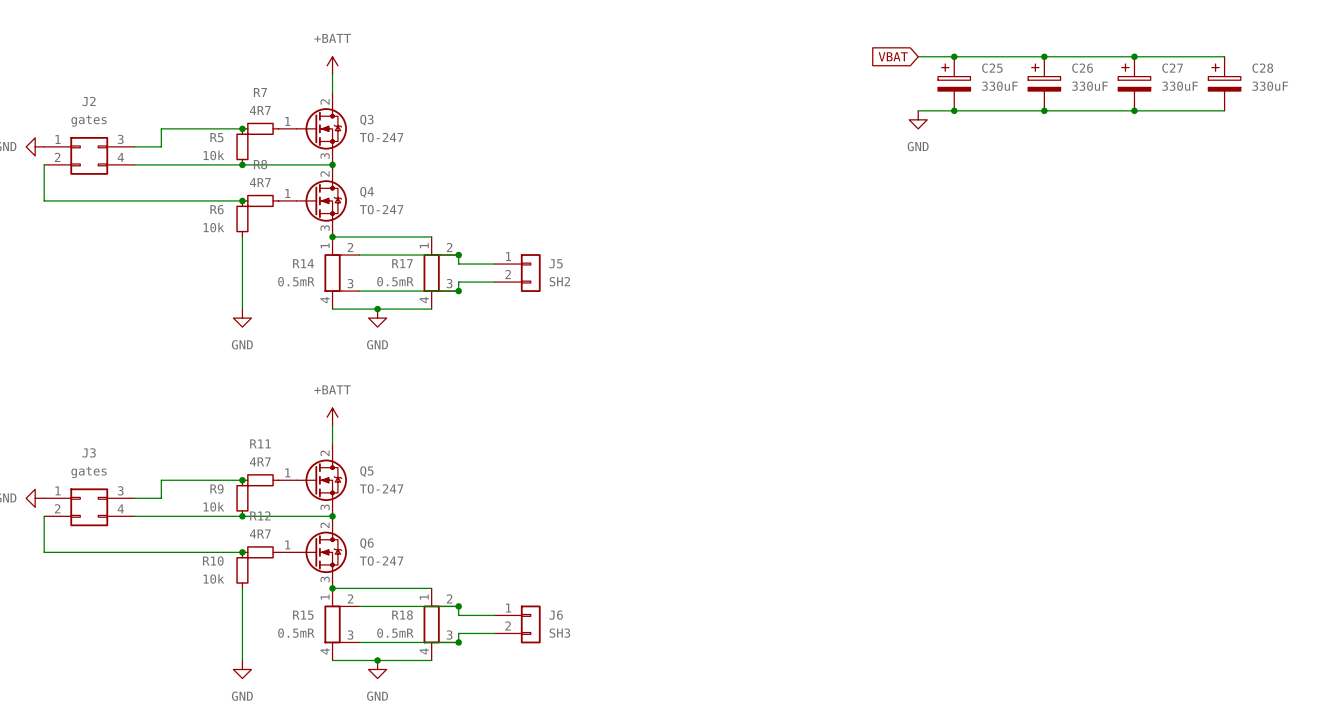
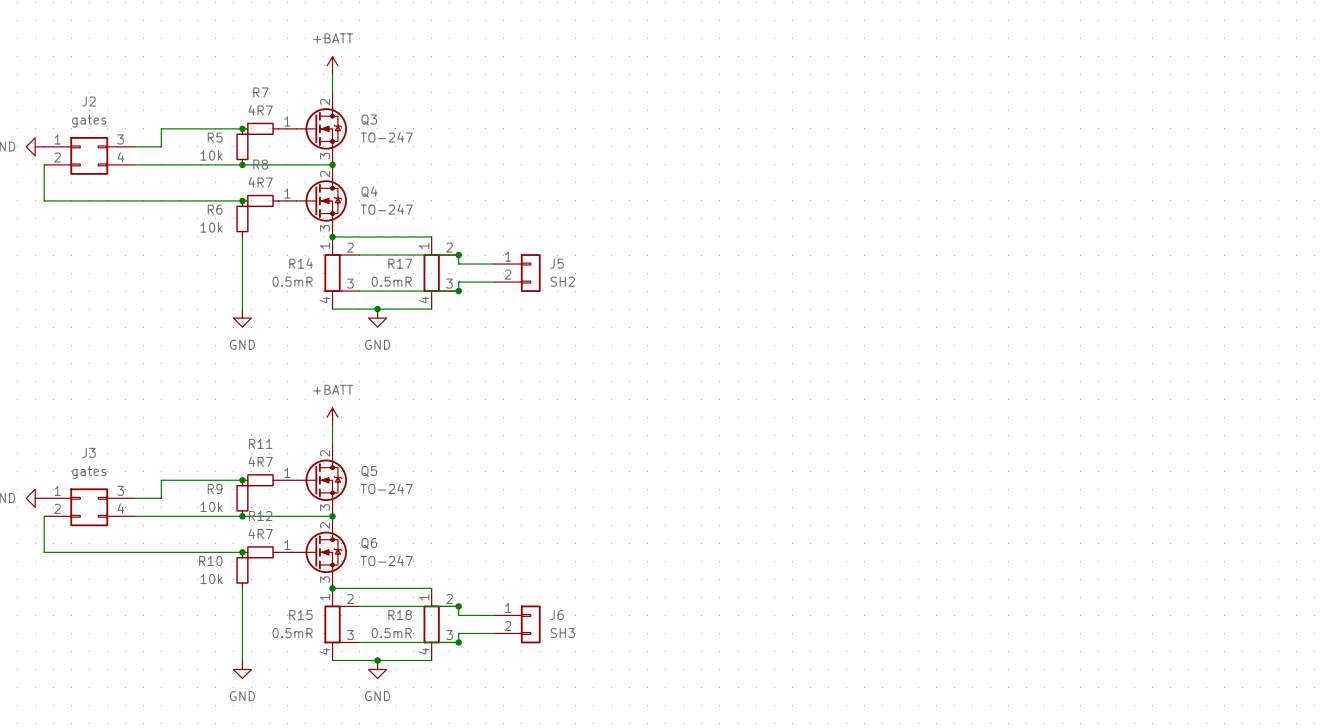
global label: VBAT (893, 56) -> none
wire: (918, 56) (1224, 56) -> none
junction: (954, 56) -> none
junction: (1044, 56) -> none
junction: (1134, 56) -> none
C25: 330uF (954, 83) -> none
C26: 330uF (1044, 83) -> none
C27: 330uF (1134, 83) -> none
C28: 330uF (1224, 83) -> none
wire: (918, 110) (1224, 110) -> none
junction: (954, 110) -> none
junction: (1044, 110) -> none
junction: (1134, 110) -> none
power symbol: GND (918, 119) -> none

